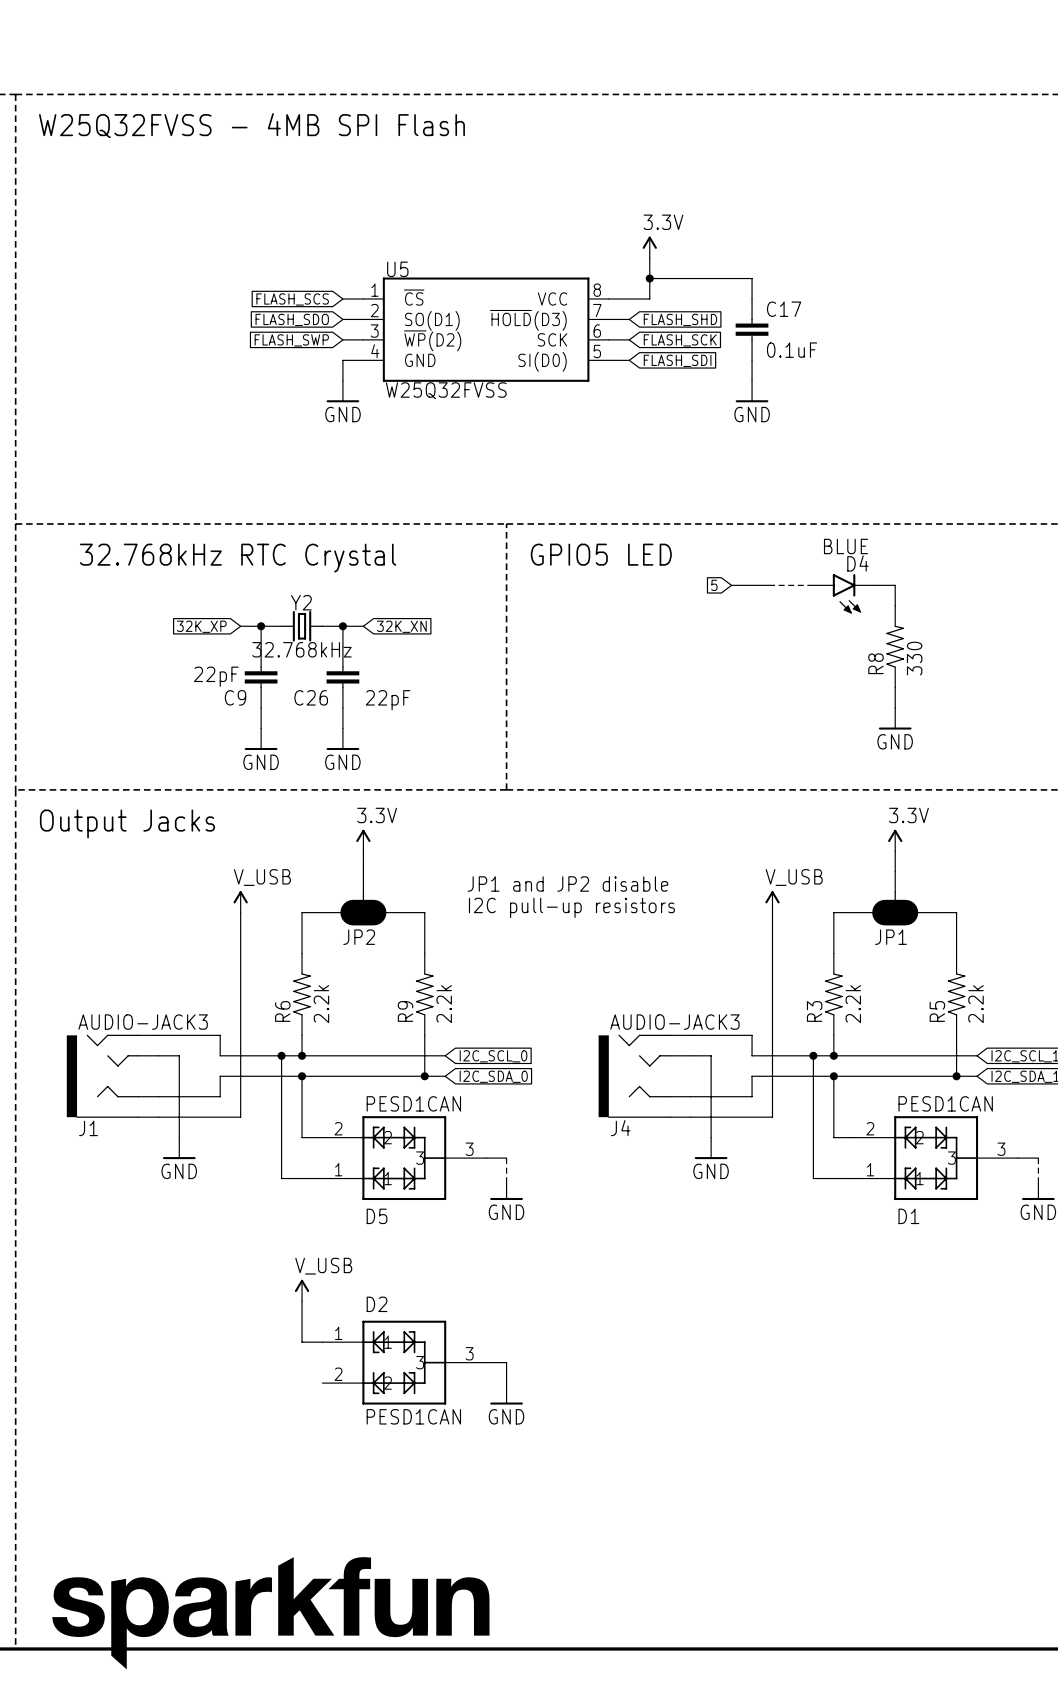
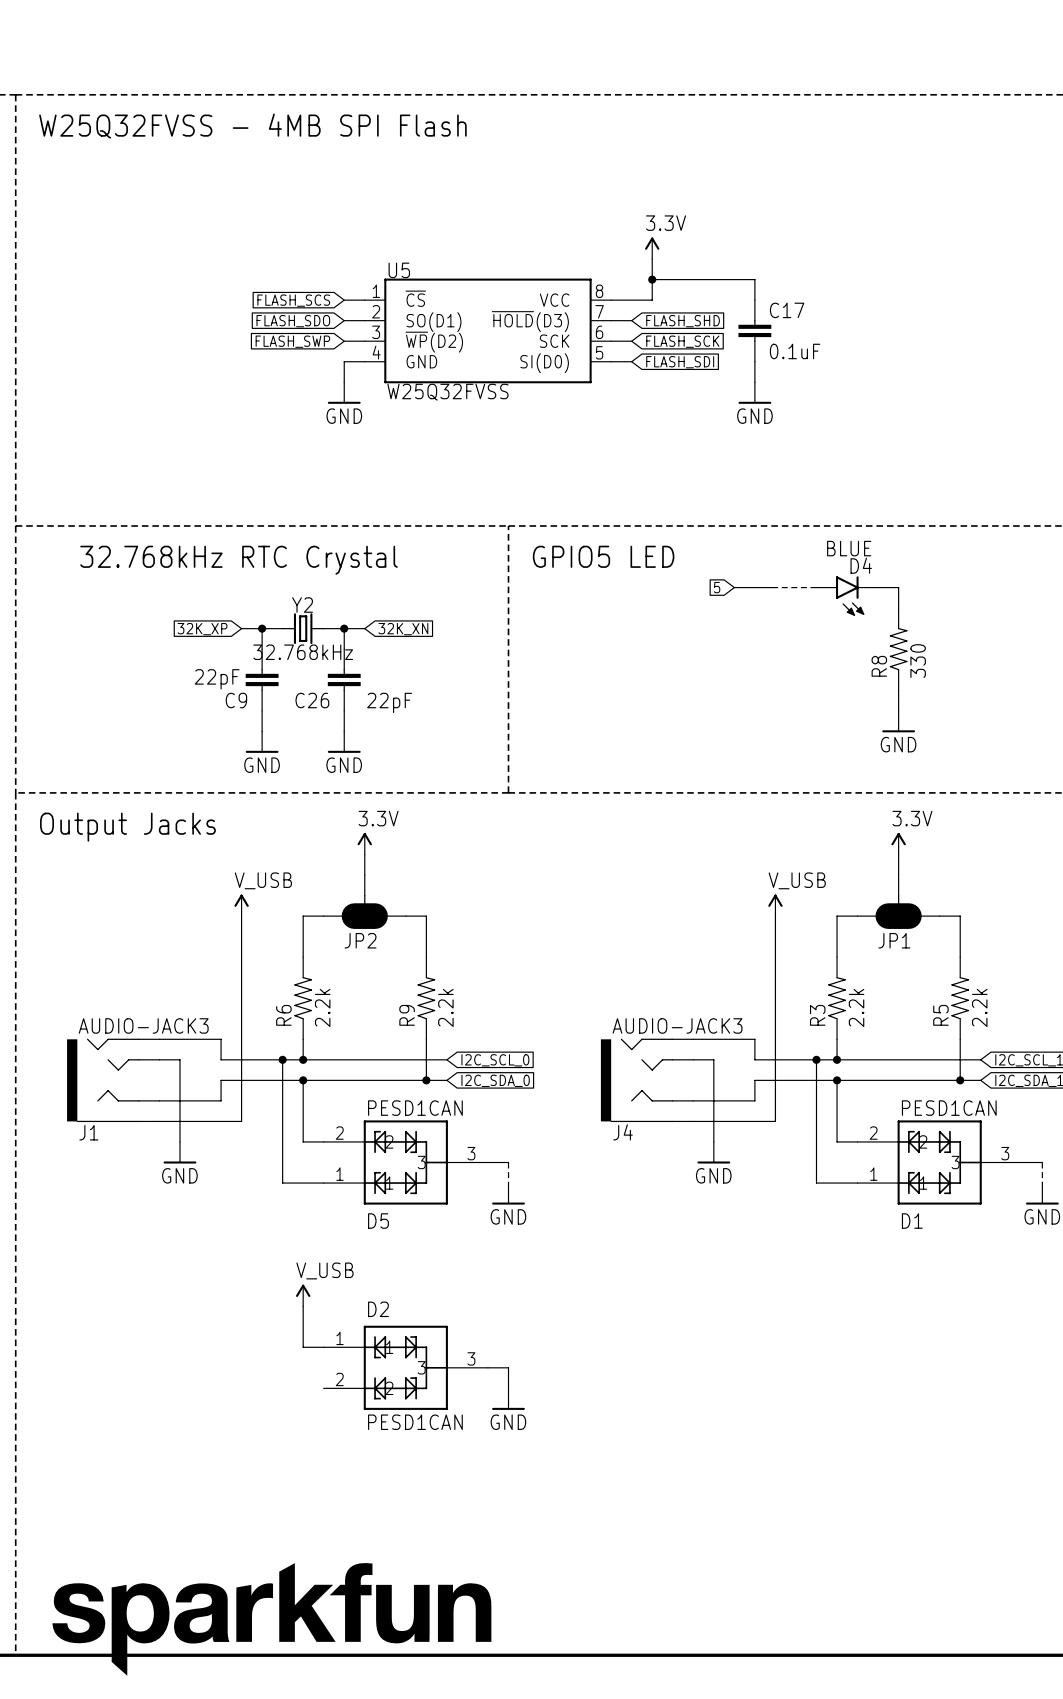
text: JP1 and JP2 disable (567, 883) -> none
text: I2C pull-up resistors (571, 907) -> none

